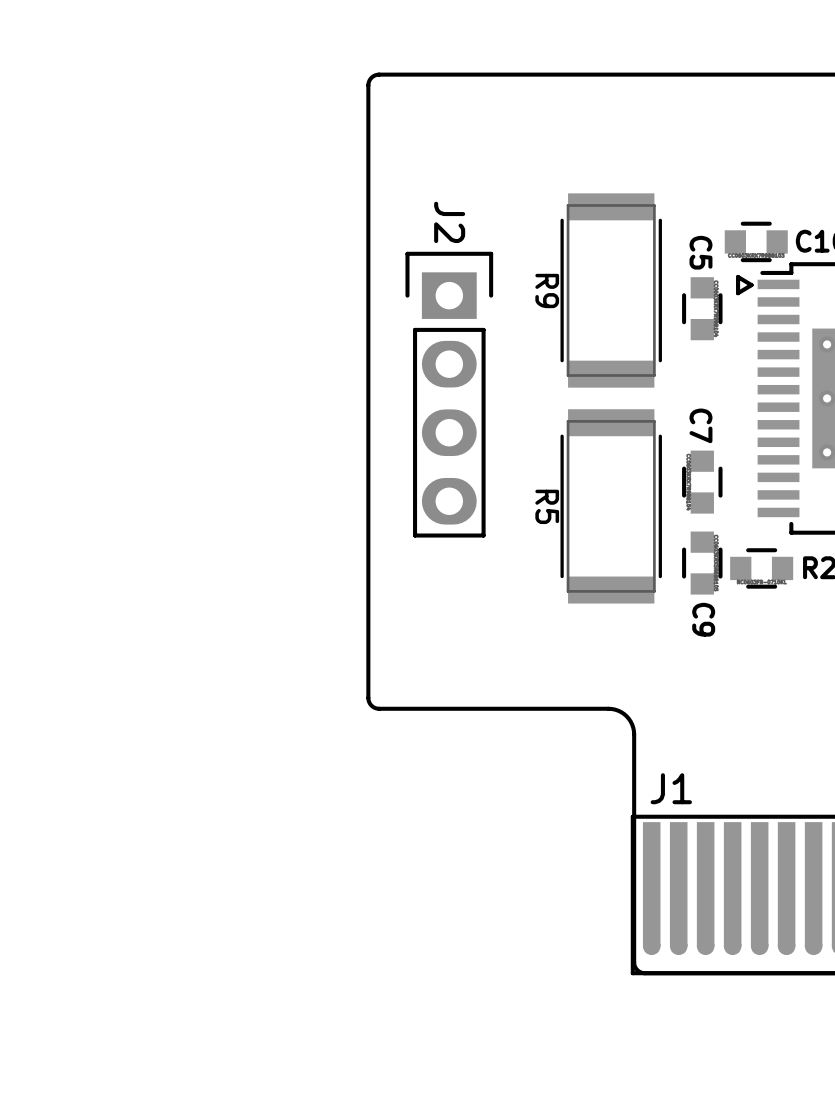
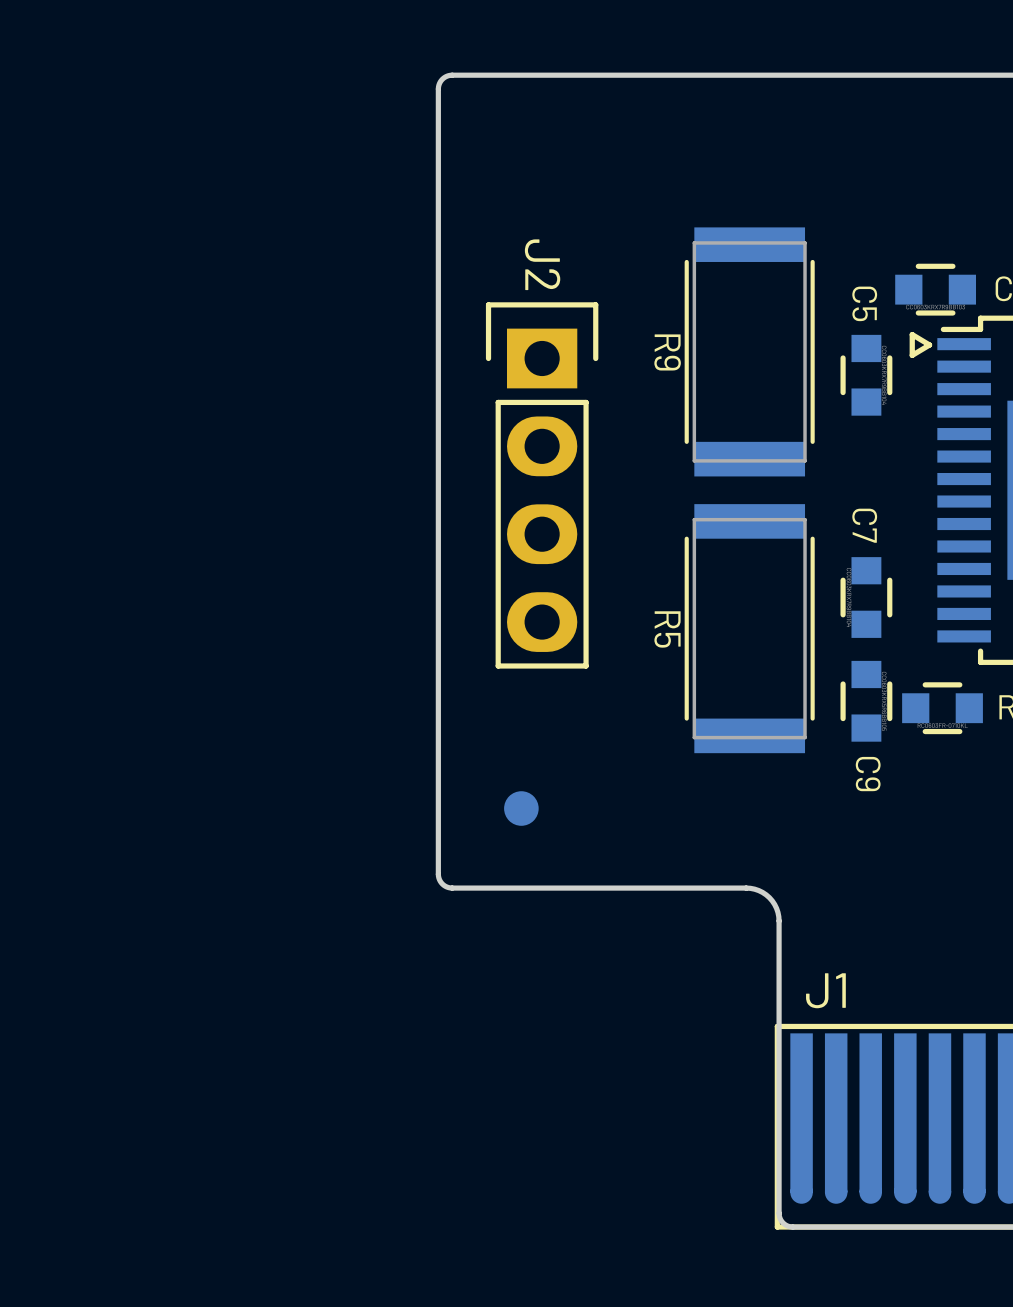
part: none -> (521, 808)

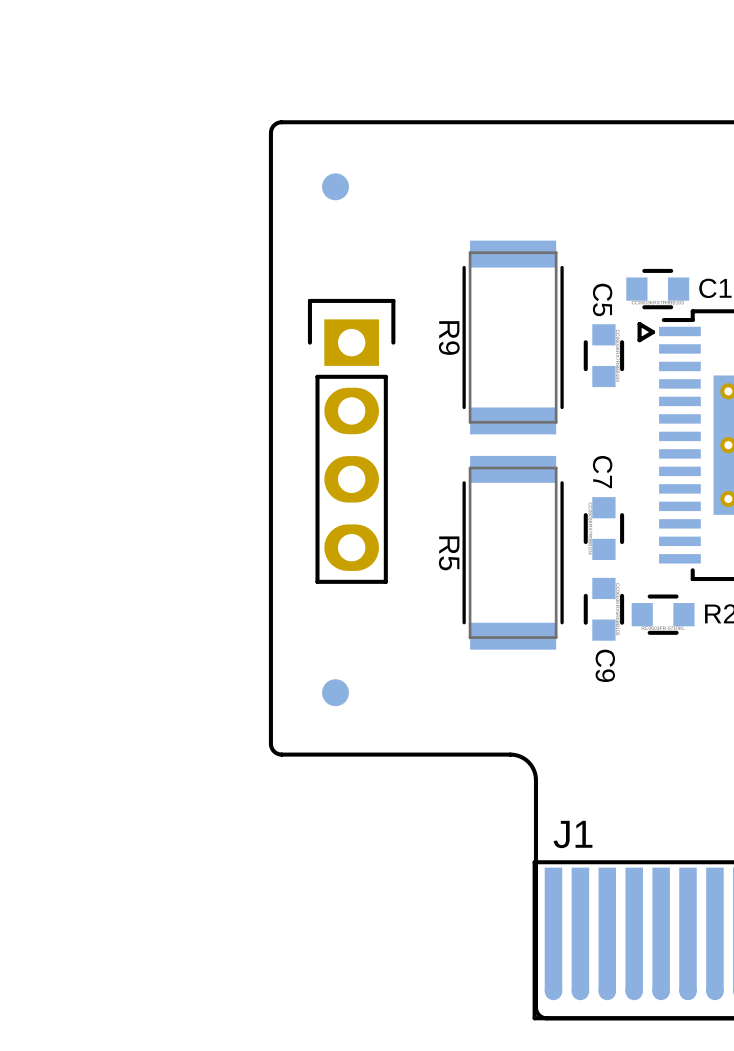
part: none -> (335, 186)
J2 name: J2 (542, 264) -> none

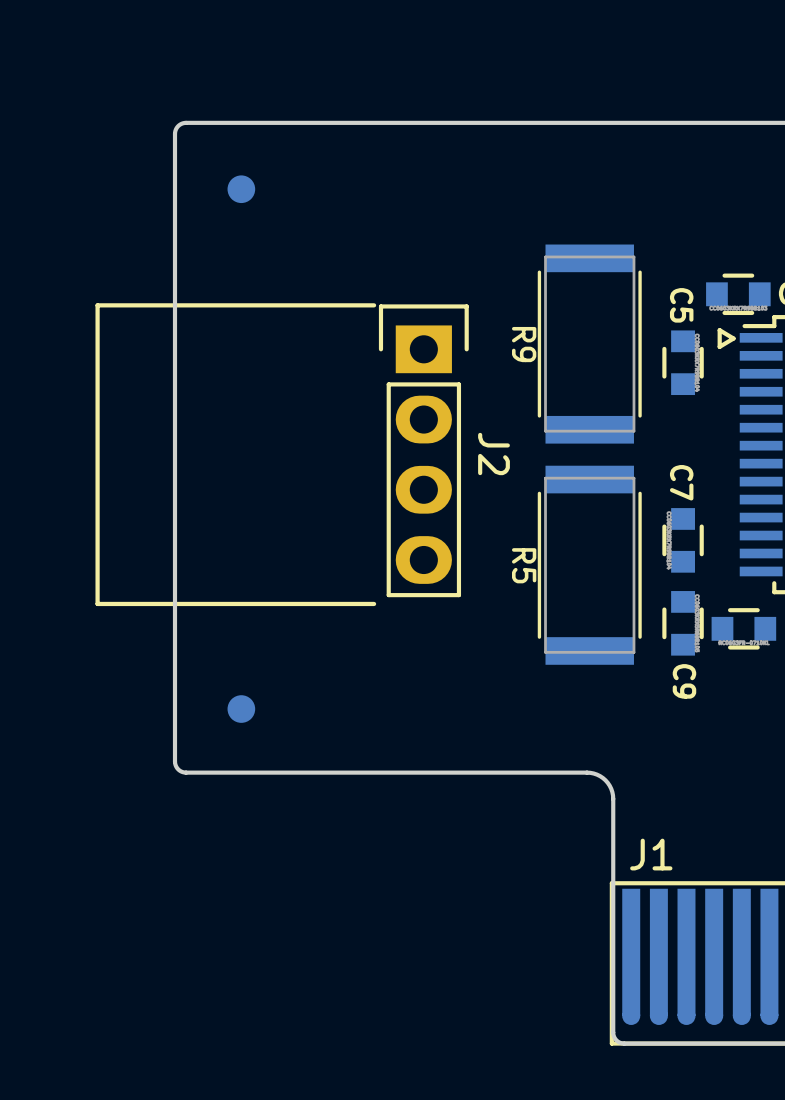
board edge: (281, 122) (274, 125) (270, 133) (270, 743) (274, 751) (281, 754) -> (351, 122) (186, 122) (178, 126) (175, 133) (175, 764) (179, 770) (186, 772) (351, 772)
part position: (335, 186) -> (241, 189)
J2: none -> (282, 454)
part position: (335, 692) -> (241, 709)

